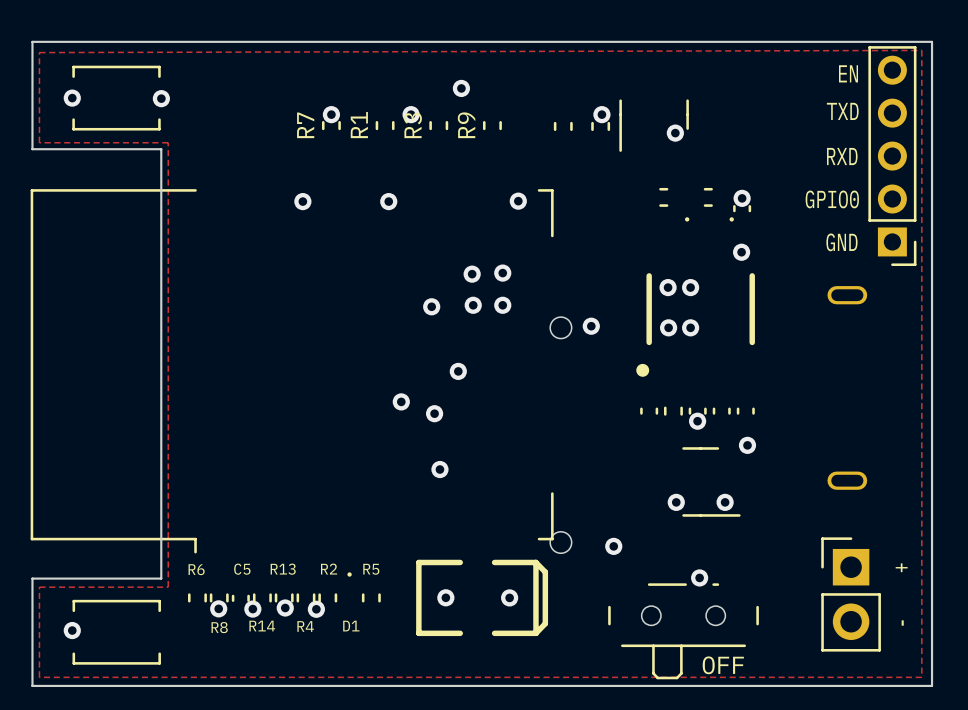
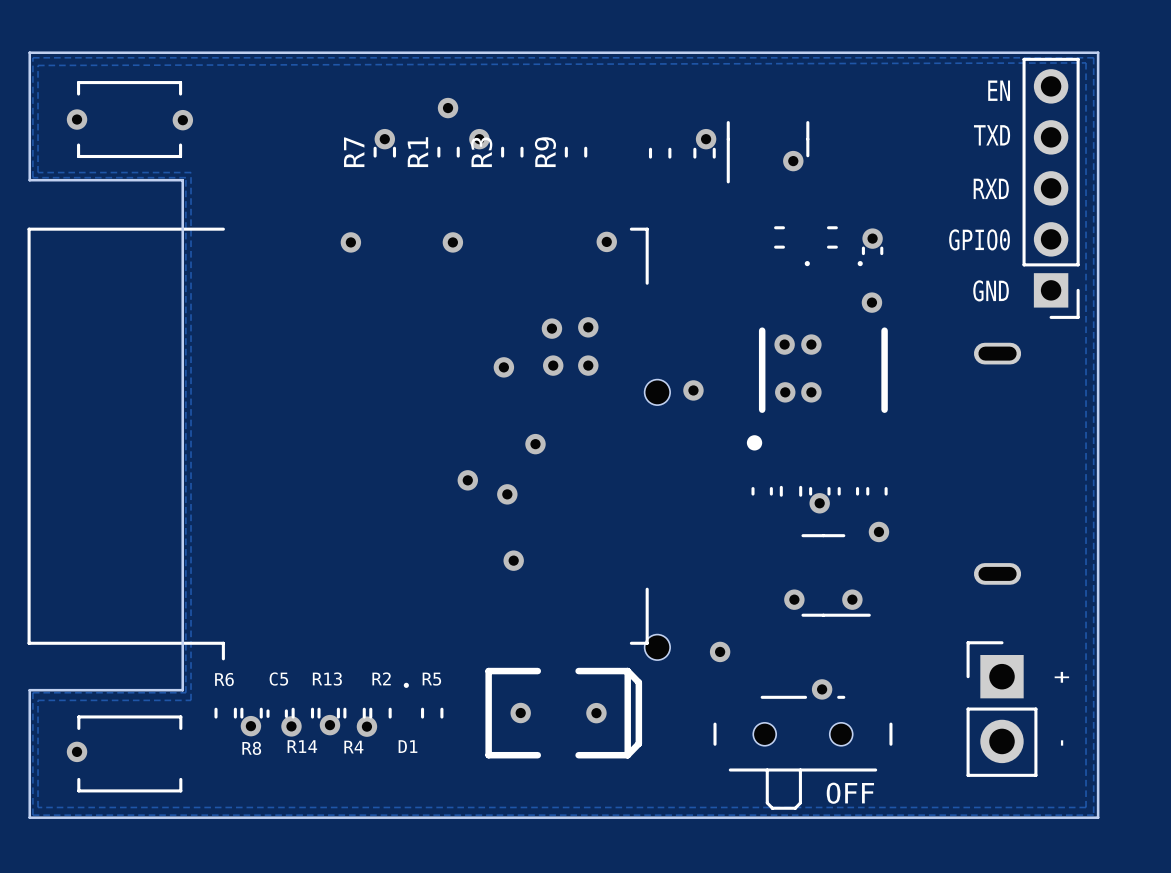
zone outline: none -> (32, 57) (32, 177) (185, 177) (185, 692) (32, 692) (32, 815) (1093, 815) (1093, 57) (32, 57)
via position: (461, 88) -> (448, 108)

